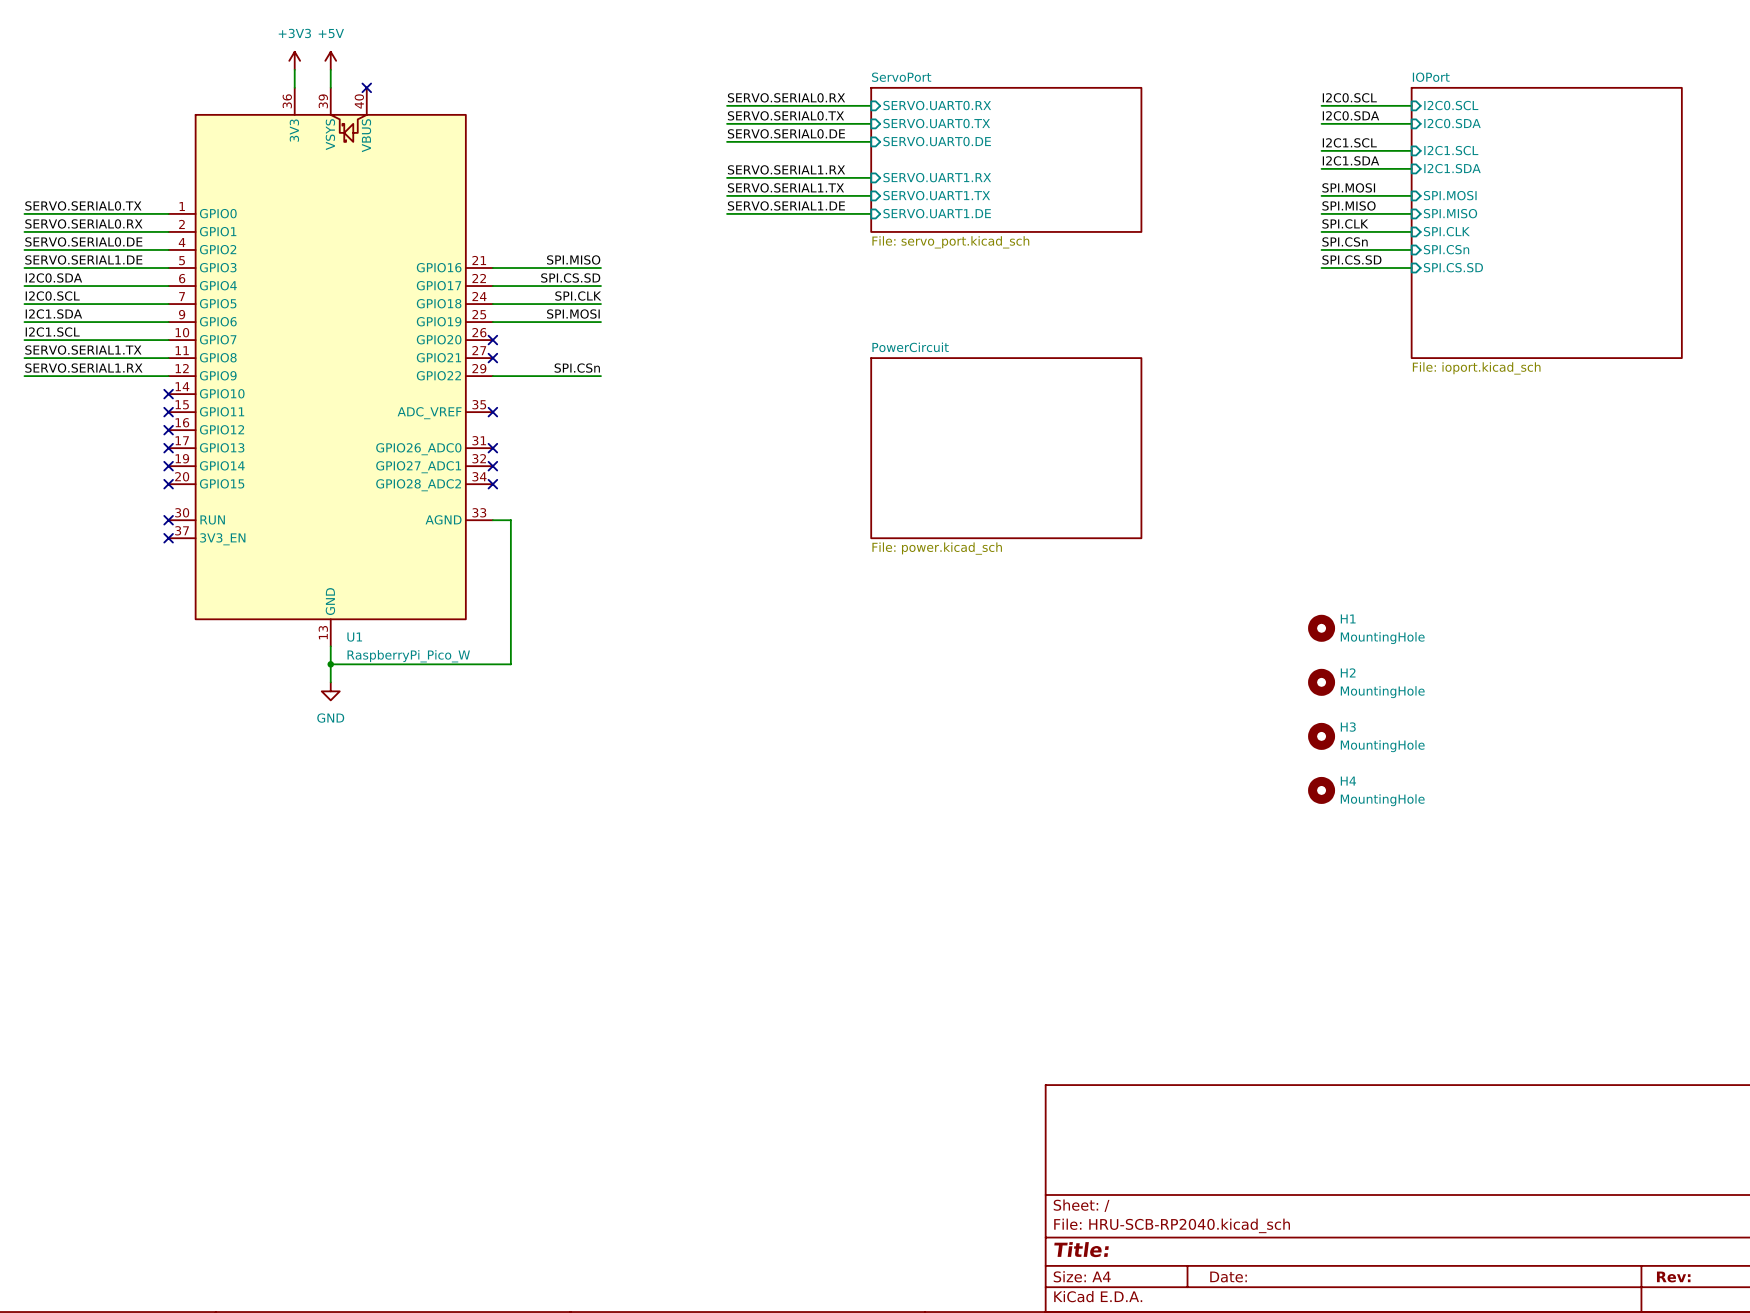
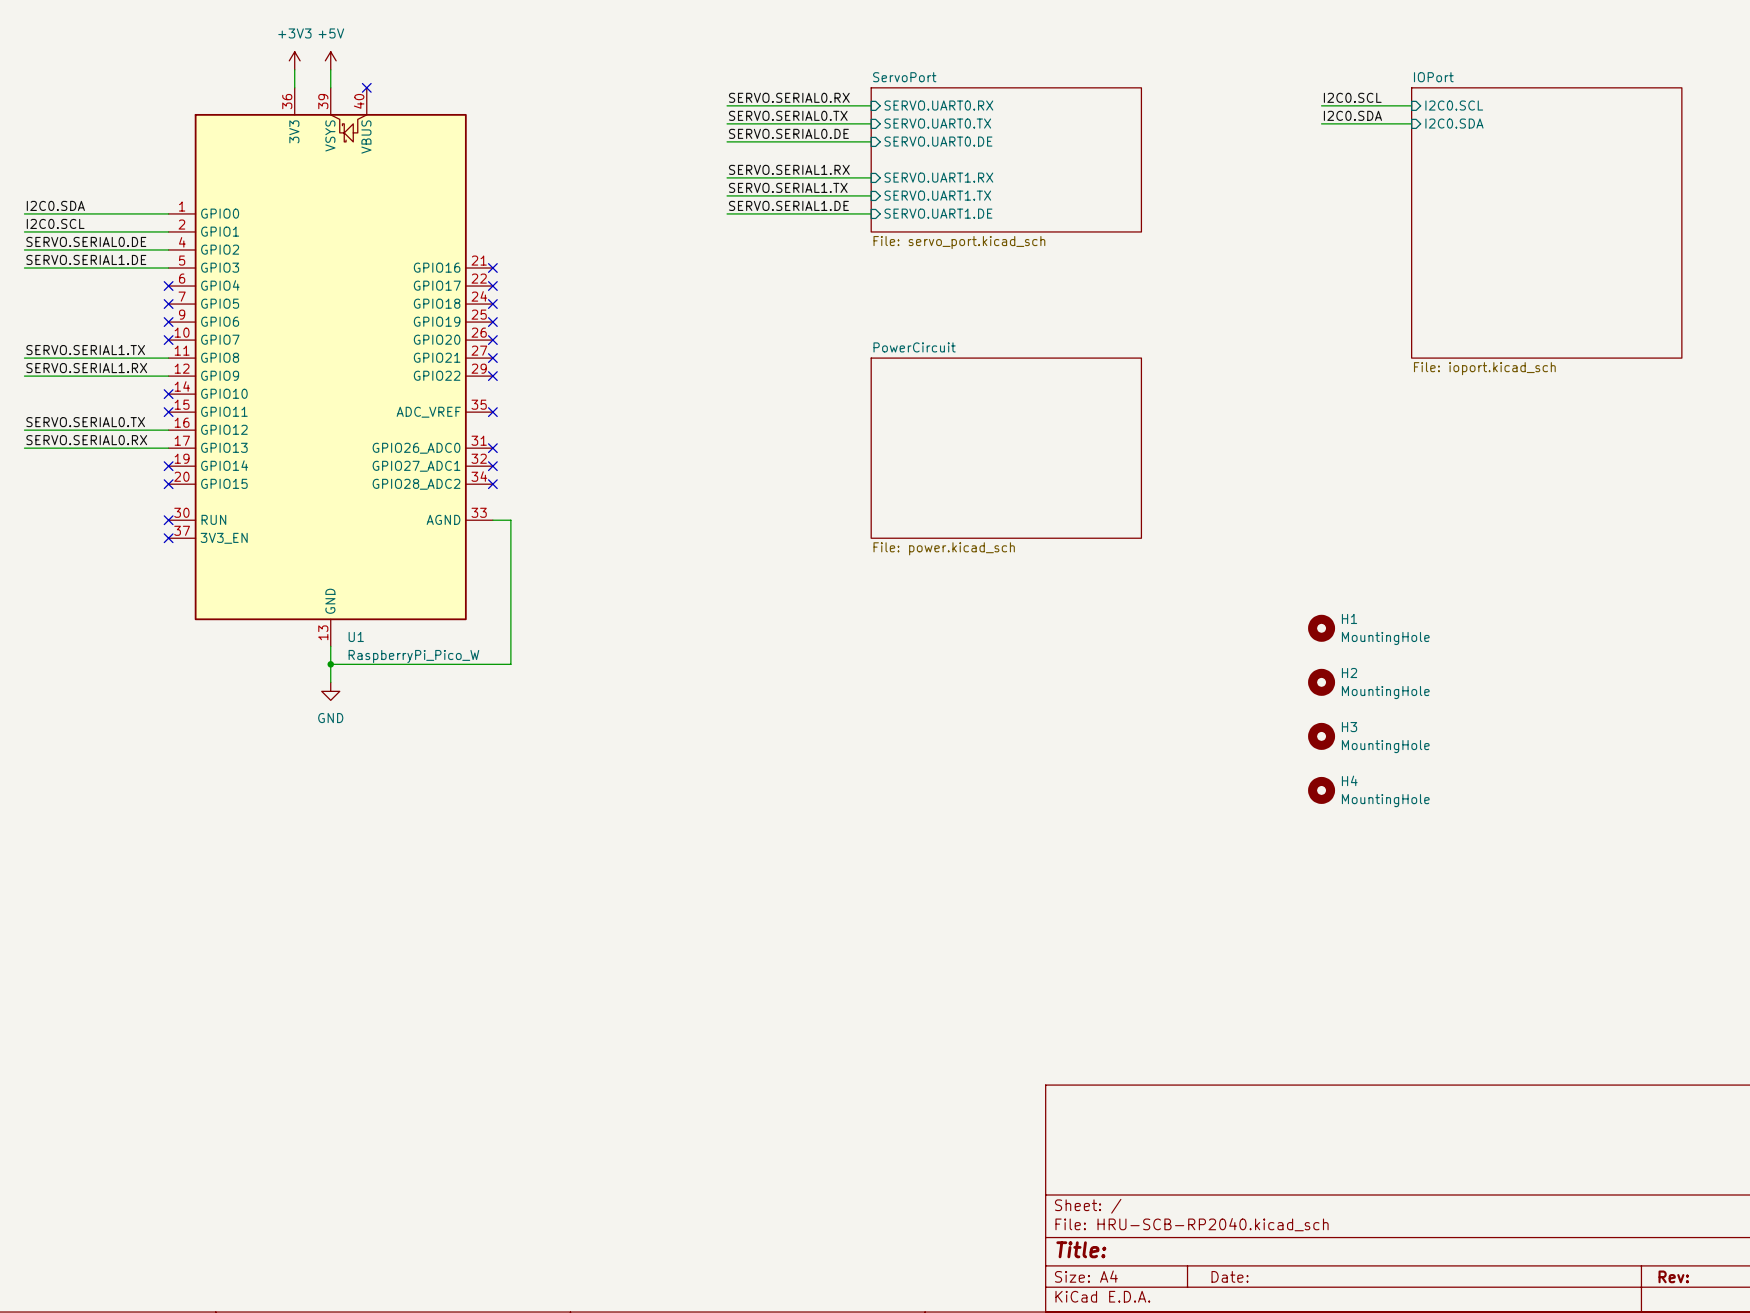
label: I2C1.SCL (1349, 142) -> none
wire: (1321, 150) (1411, 150) -> none
sheet pin: I2C1.SCL (1451, 150) -> none
label: I2C1.SDA (1350, 160) -> none
wire: (1321, 168) (1411, 168) -> none
sheet pin: I2C1.SDA (1452, 168) -> none
label: SPI.MOSI (1348, 187) -> none
wire: (1321, 195) (1411, 195) -> none
sheet pin: SPI.MOSI (1450, 195) -> none
label: SERVO.SERIAL0.TX (83, 205) -> I2C0.SDA (55, 205)
label: SPI.MISO (1348, 205) -> none
wire: (1321, 213) (1411, 213) -> none
sheet pin: SPI.MISO (1450, 213) -> none
label: SERVO.SERIAL0.RX (83, 223) -> I2C0.SCL (55, 223)
label: SPI.CLK (1345, 223) -> none
wire: (1321, 231) (1411, 231) -> none
sheet pin: SPI.CLK (1446, 231) -> none
label: SPI.CSn (1345, 241) -> none
wire: (1321, 249) (1411, 249) -> none
sheet pin: SPI.CSn (1446, 249) -> none
label: SPI.MISO (573, 259) -> none
label: SPI.CS.SD (1351, 259) -> none
sheet pin: SPI.CS.SD (1453, 267) -> none
wire: (492, 268) (600, 268) -> none
no-connect mark: none -> (492, 268)
wire: (1321, 268) (1411, 268) -> none
label: I2C0.SDA (53, 277) -> none
label: SPI.CS.SD (570, 277) -> none
wire: (24, 286) (168, 286) -> none
no-connect mark: none -> (168, 286)
wire: (492, 286) (600, 286) -> none
no-connect mark: none -> (492, 286)
label: I2C0.SCL (52, 296) -> none
label: SPI.CLK (578, 296) -> none
wire: (24, 304) (168, 304) -> none
no-connect mark: none -> (168, 304)
wire: (492, 304) (600, 304) -> none
no-connect mark: none -> (492, 304)
label: I2C1.SDA (53, 314) -> none
label: SPI.MOSI (573, 314) -> none
wire: (24, 322) (168, 322) -> (24, 430) (168, 430)
no-connect mark: none -> (168, 322)
wire: (492, 322) (600, 322) -> none
no-connect mark: none -> (492, 322)
label: I2C1.SCL (52, 332) -> none
wire: (24, 340) (168, 340) -> (24, 448) (168, 448)
no-connect mark: none -> (168, 340)
label: SPI.CSn (577, 368) -> none
wire: (492, 376) (600, 376) -> none
no-connect mark: none -> (492, 376)
label: none -> SERVO.SERIAL0.TX (85, 422)
no-connect mark: (168, 430) -> none
label: none -> SERVO.SERIAL0.RX (86, 440)
no-connect mark: (168, 448) -> none

